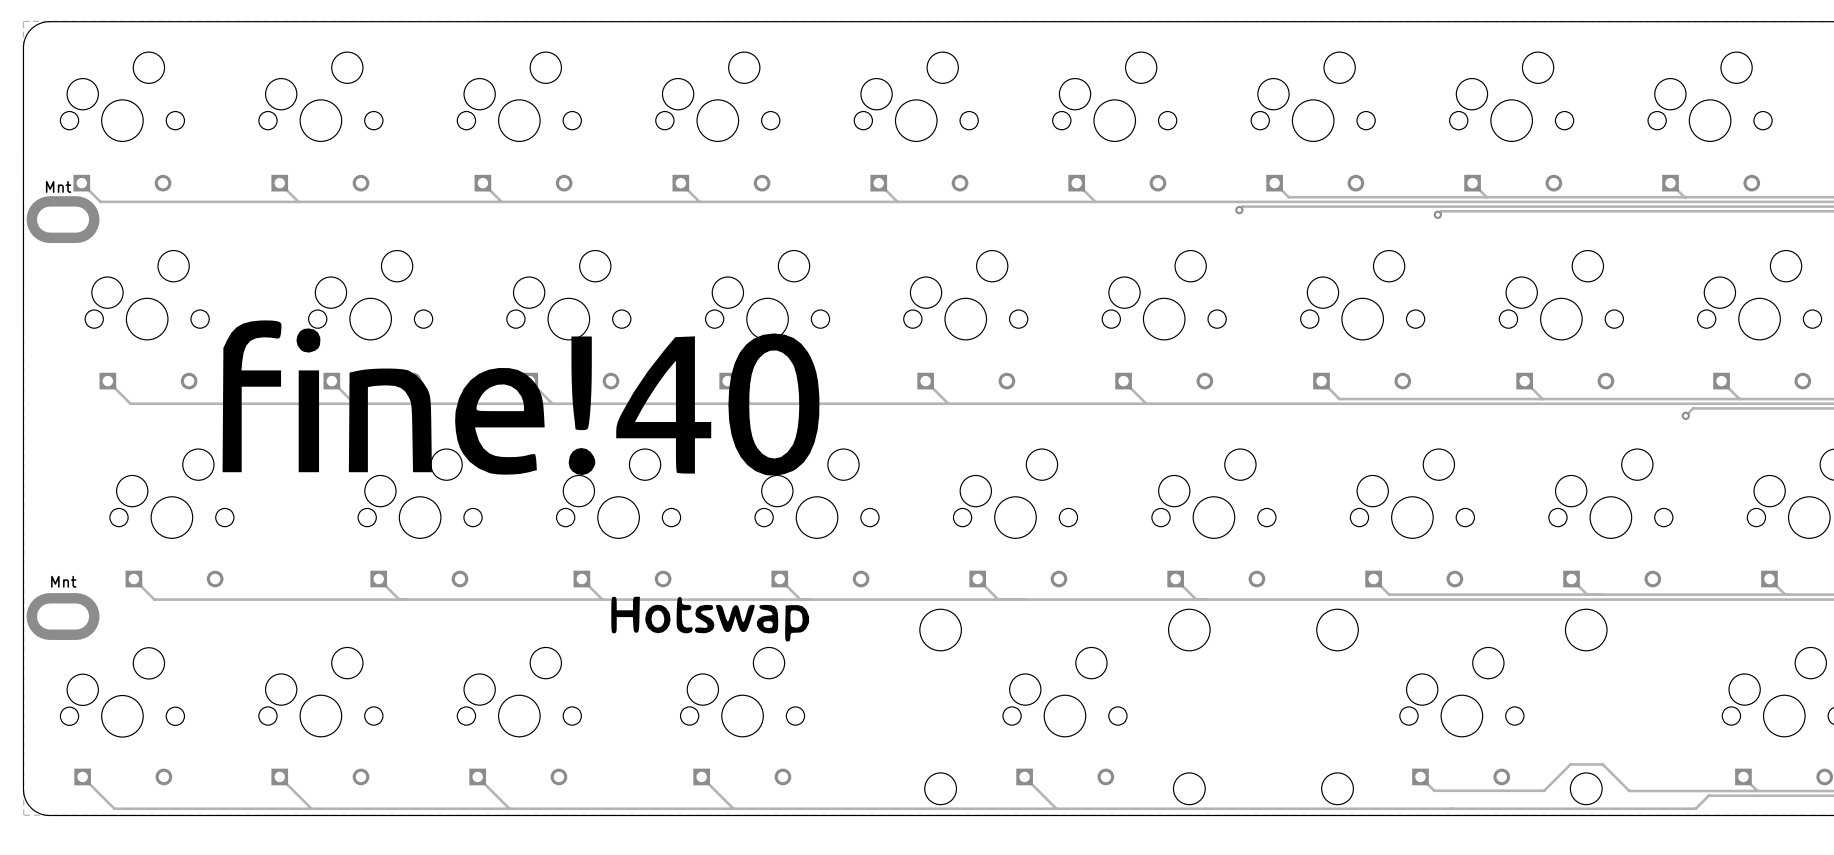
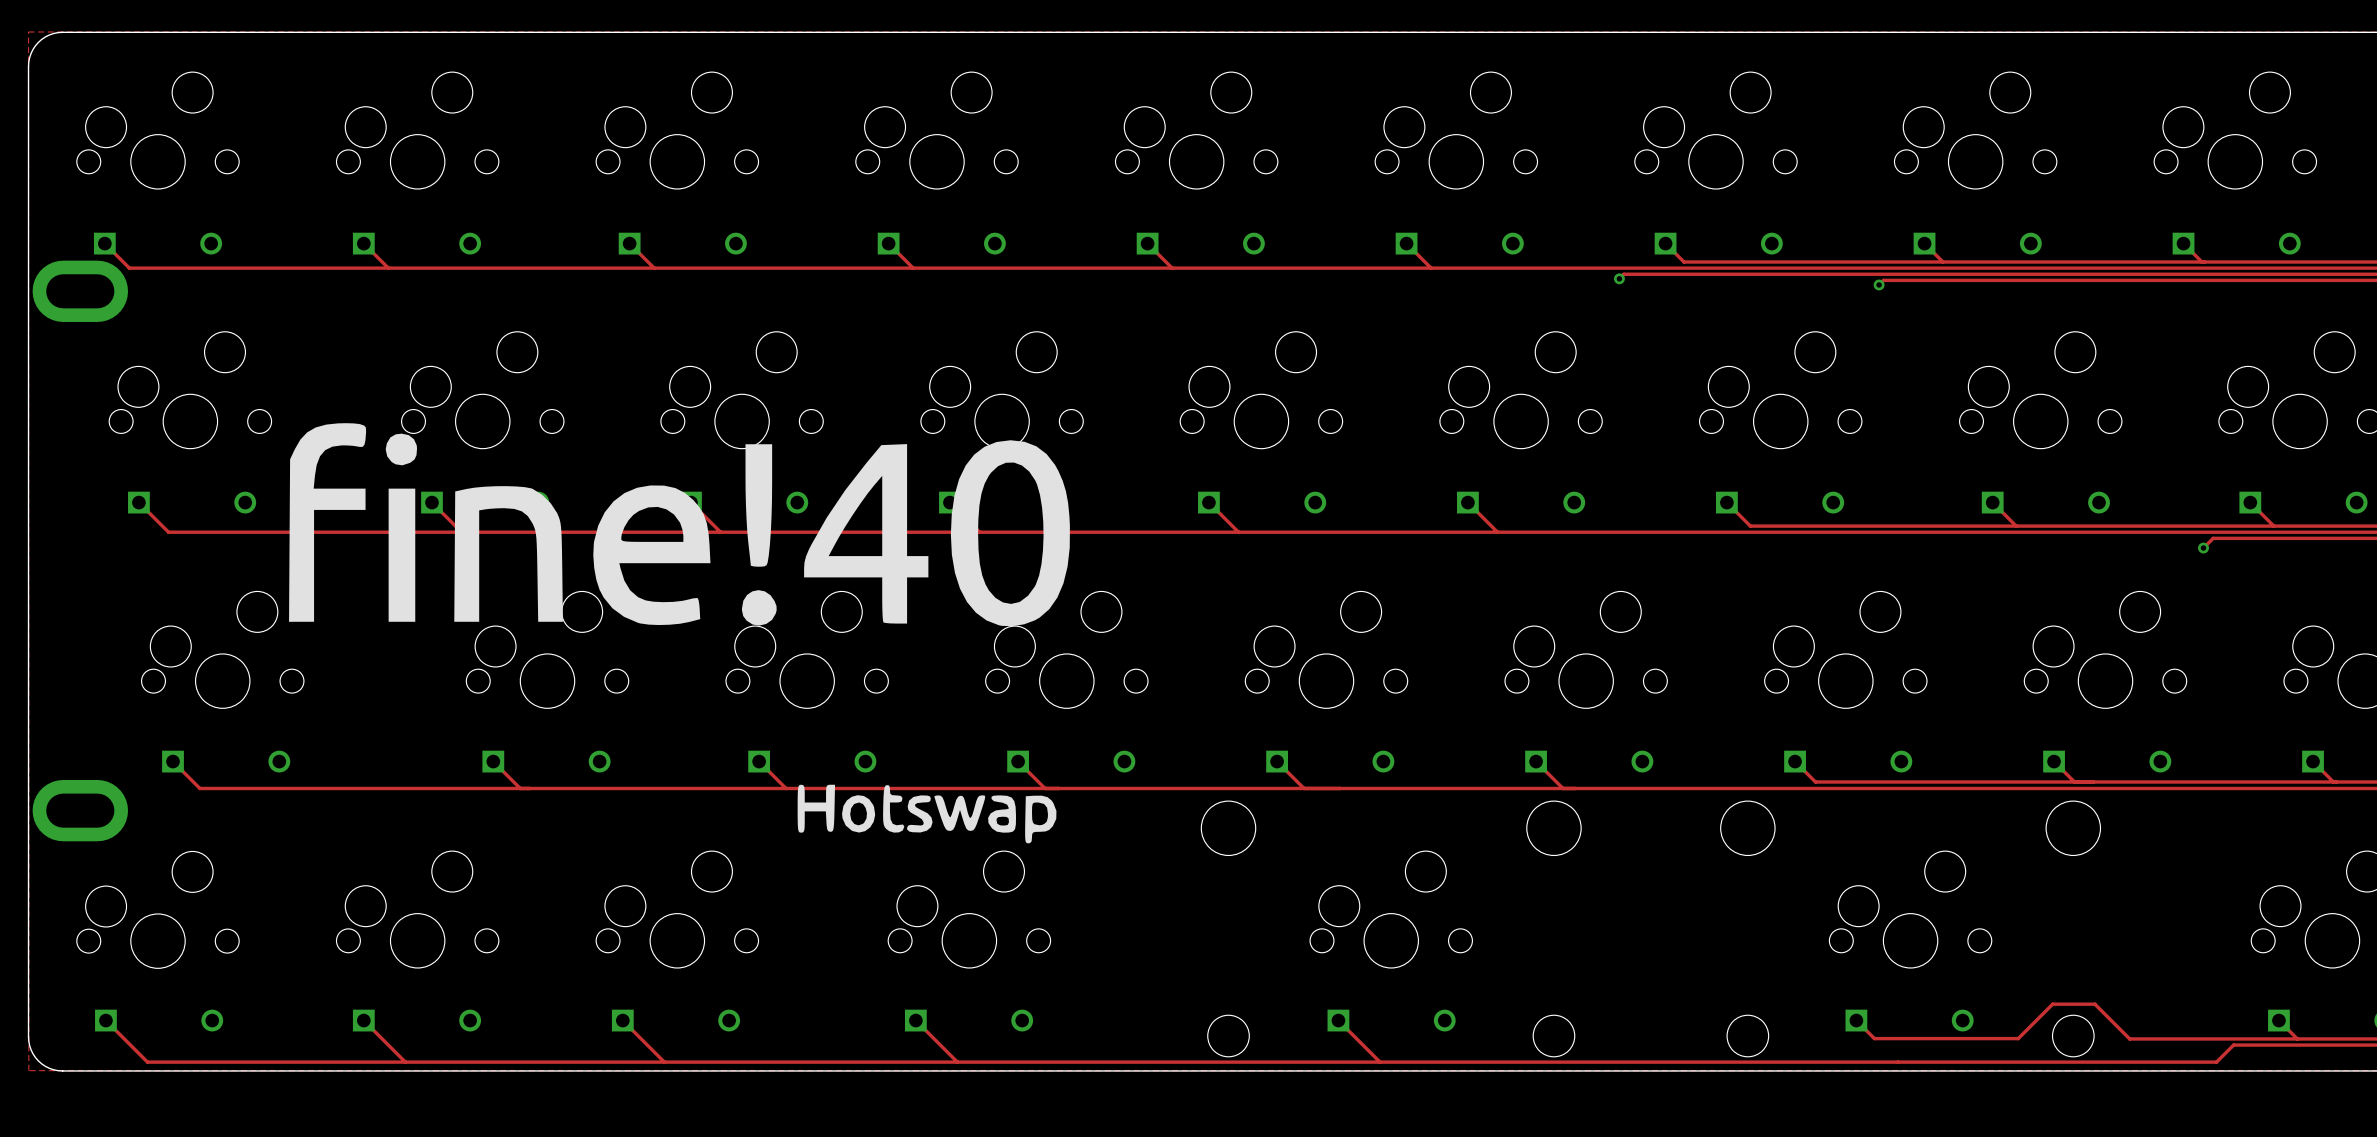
Mnt name: Mnt (58, 186) -> none
Mnt name: Mnt (63, 581) -> none

